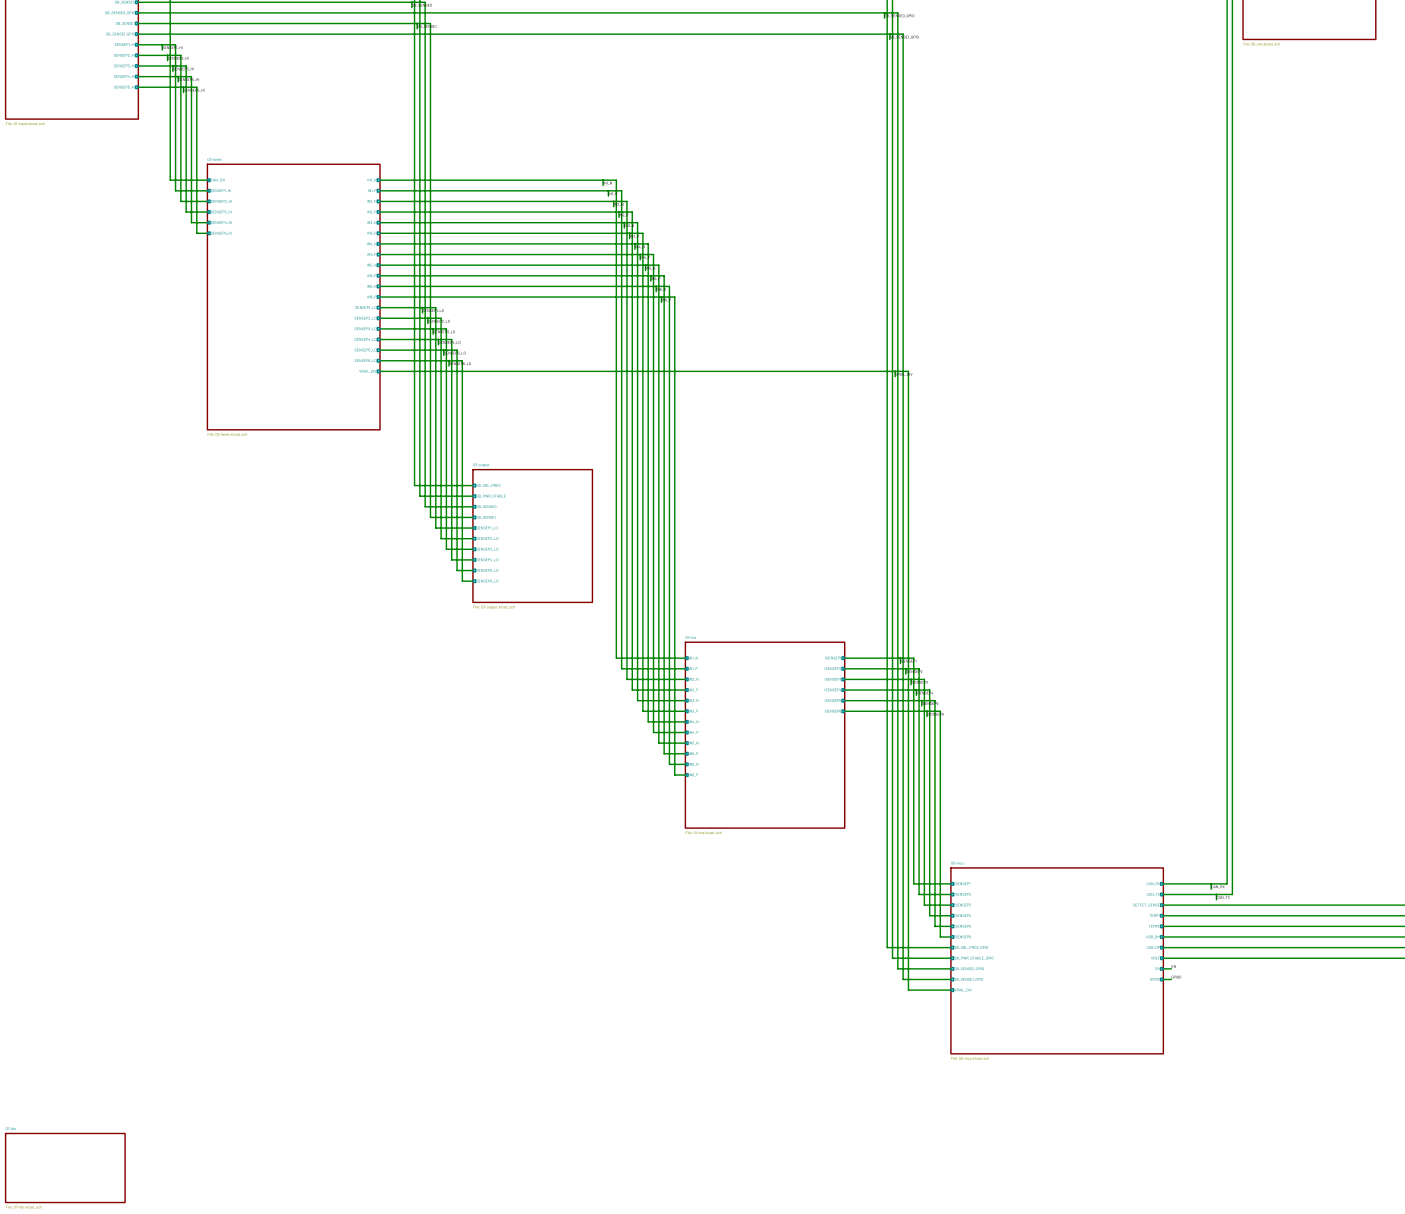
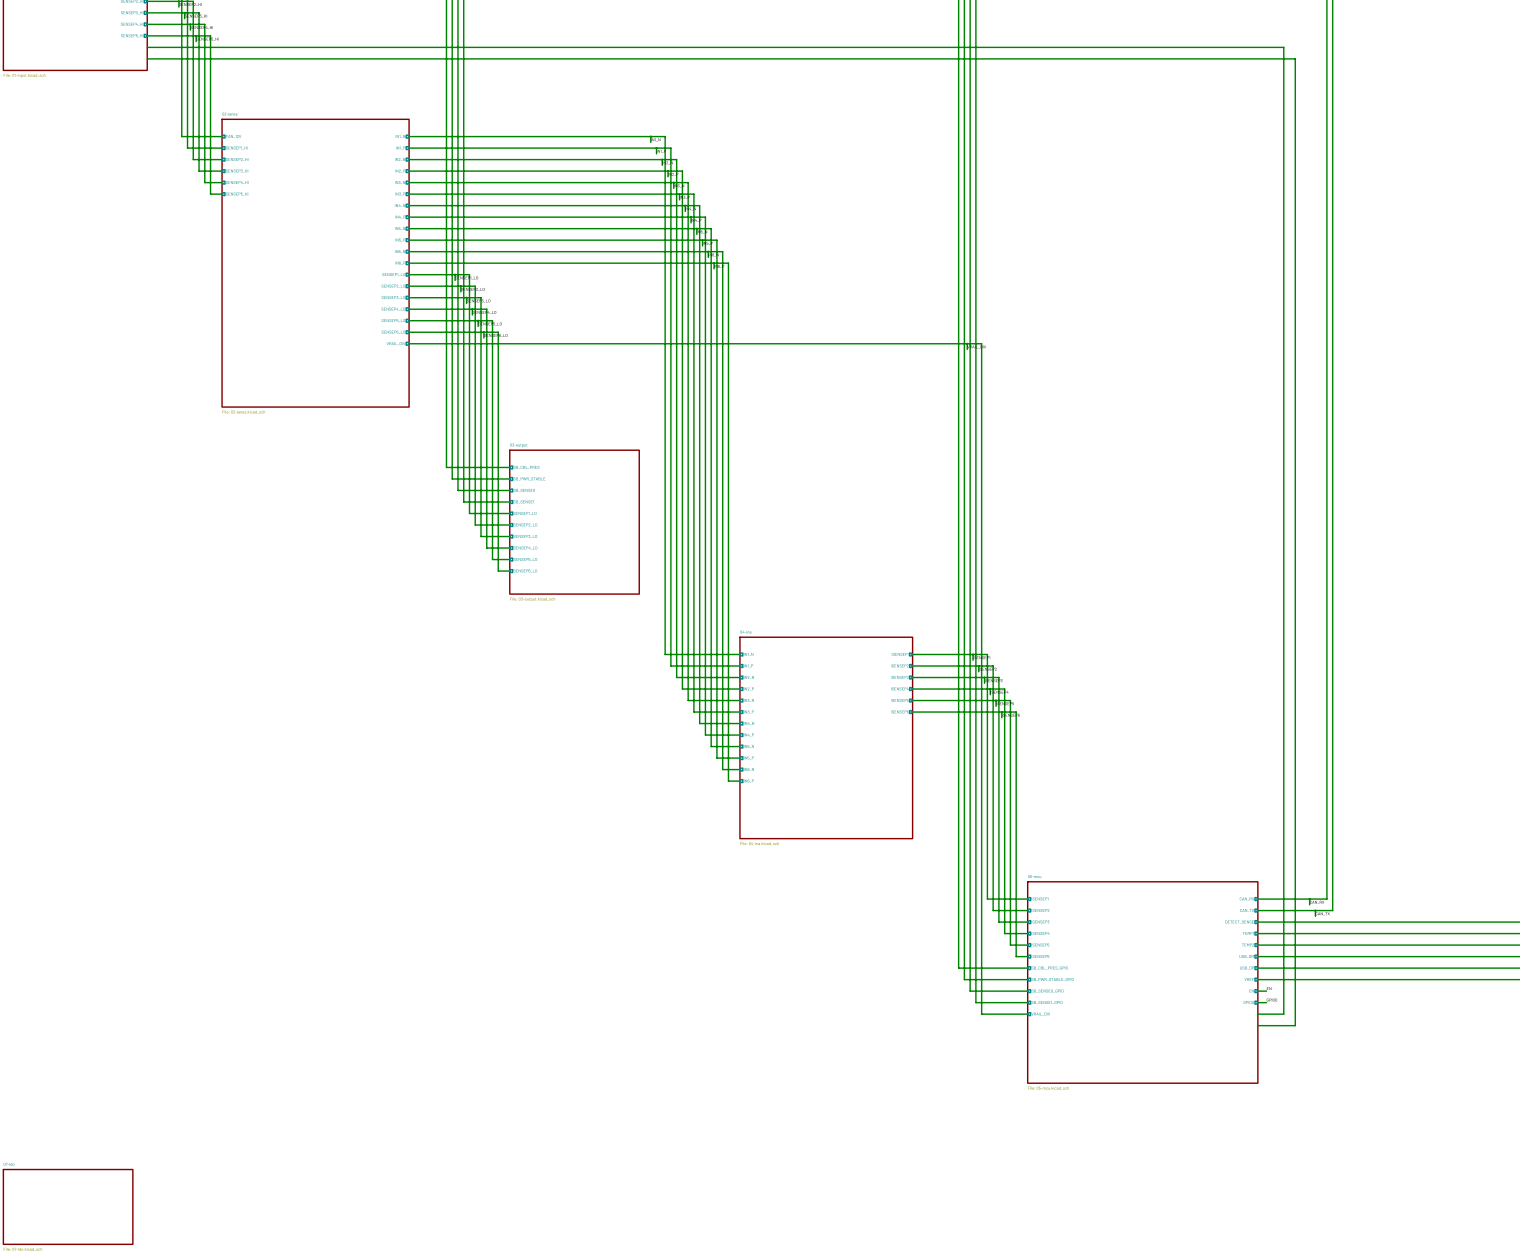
wire: none -> (147, 47) (1283, 47) (1283, 1014) (1257, 1014)
wire: none -> (147, 58) (1295, 58) (1295, 1025) (1257, 1025)

